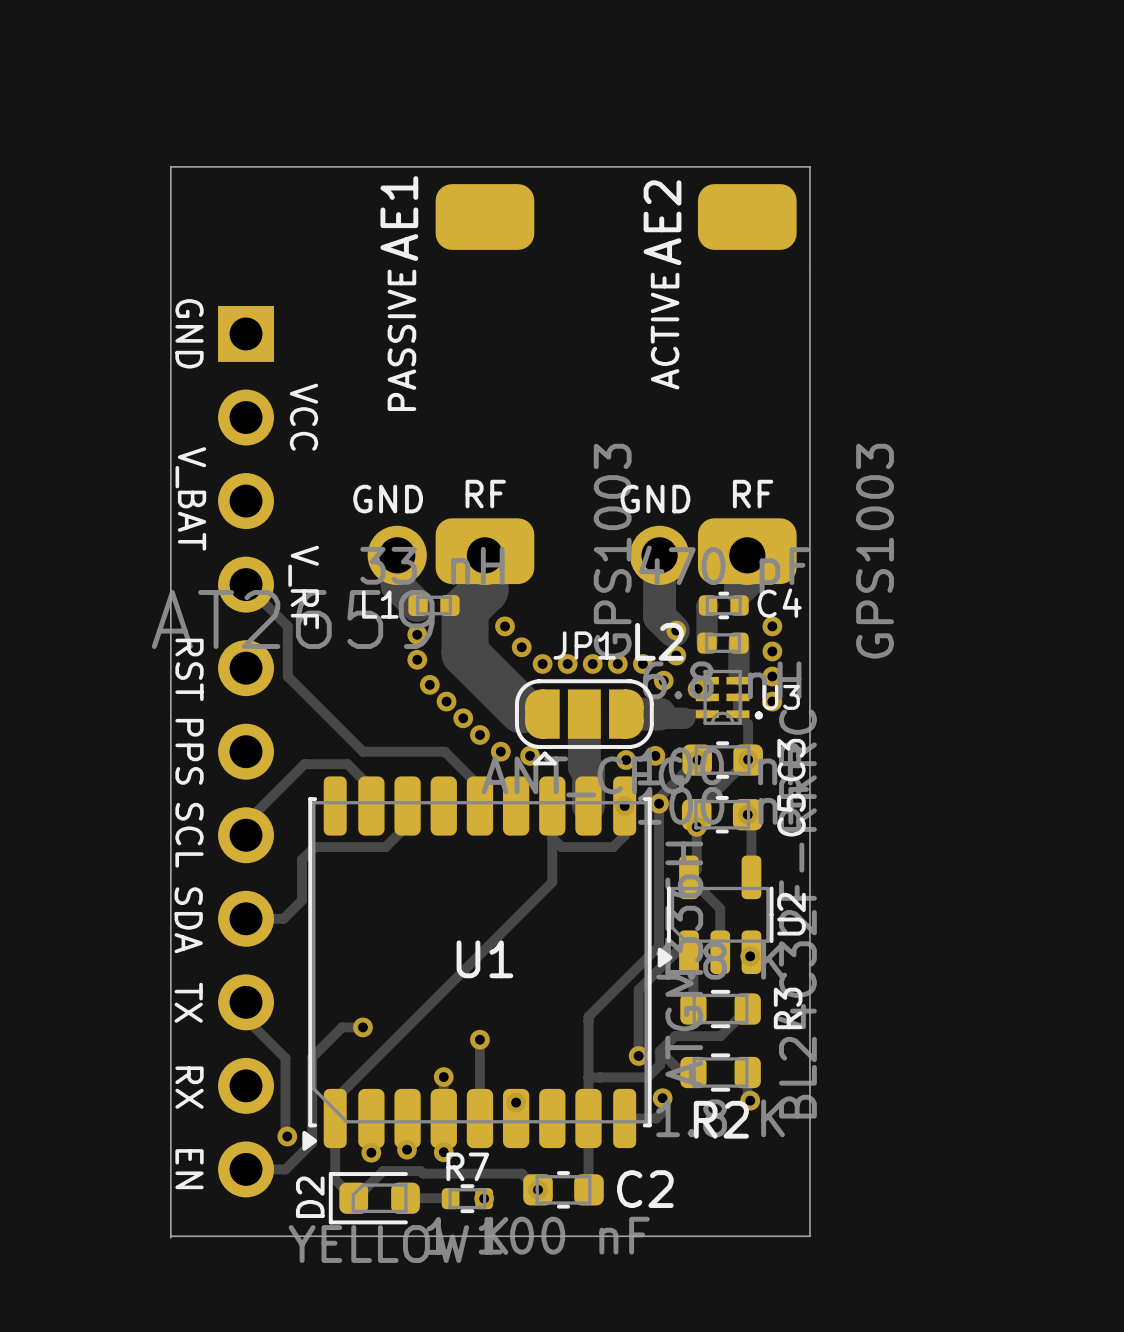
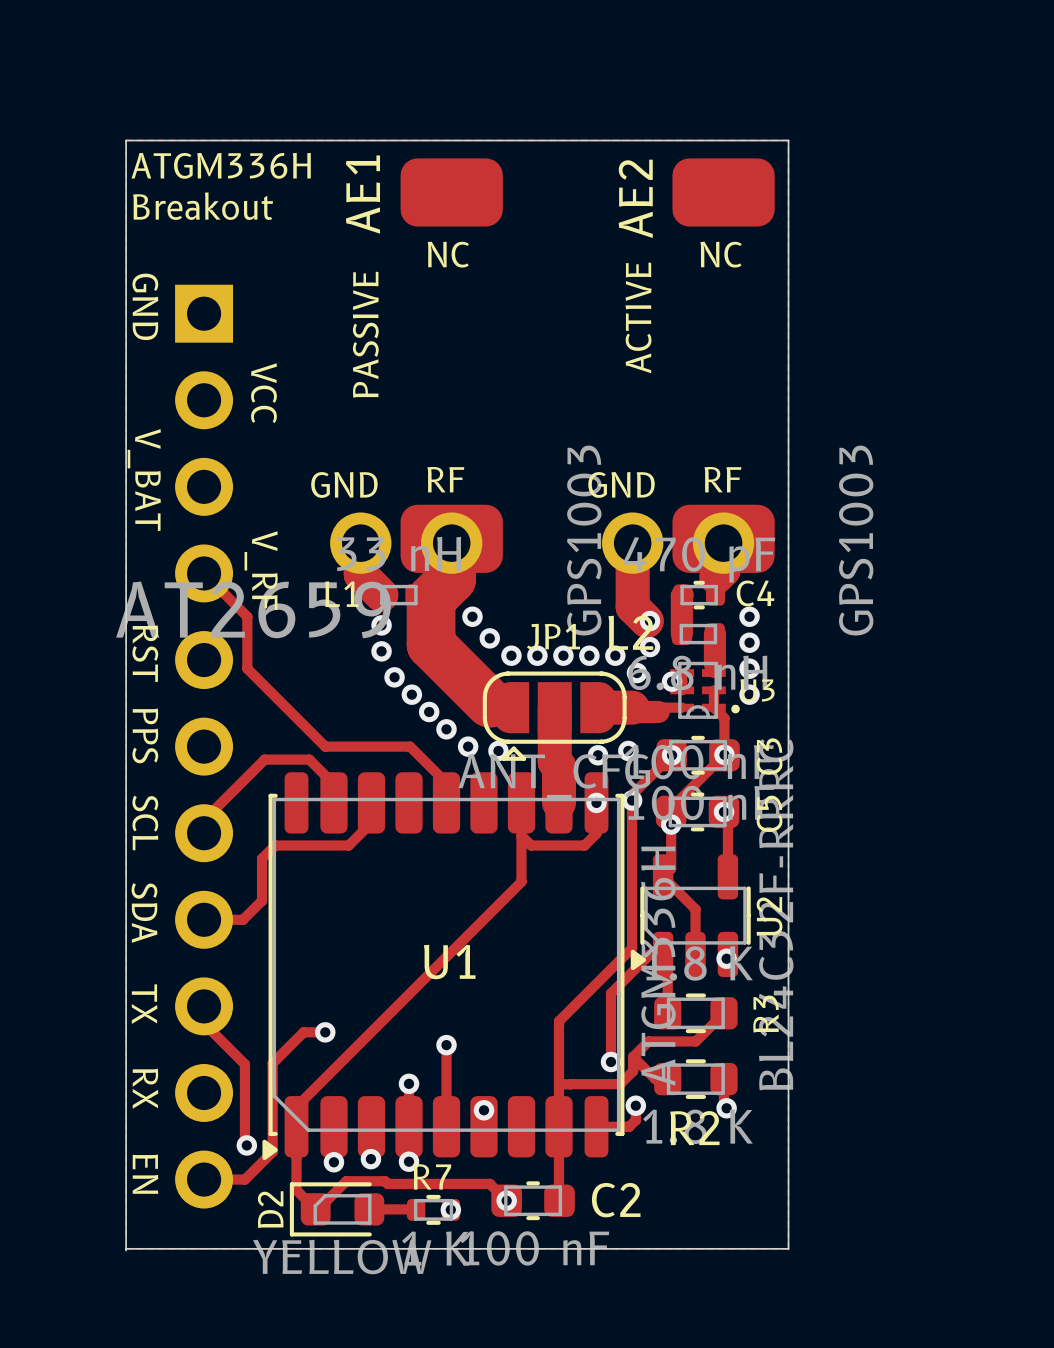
text: none -> ATGM336H (221, 165)
text: none -> Breakout (203, 206)
text: none -> NC (448, 254)
text: none -> NC (721, 254)

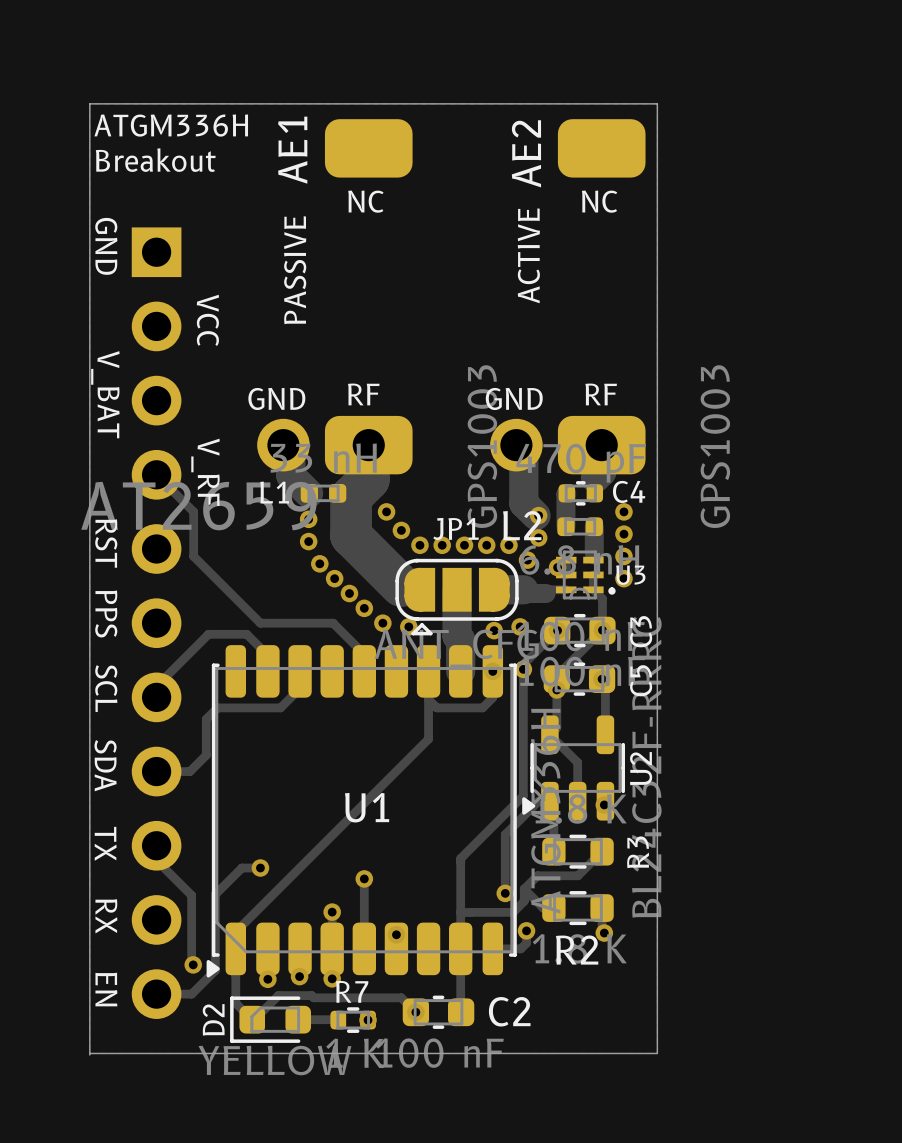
AE1 footprint: [330, 158, 503, 574] -> [257, 119, 413, 475]
AE2 footprint: [601, 158, 775, 574] -> [490, 119, 646, 475]

